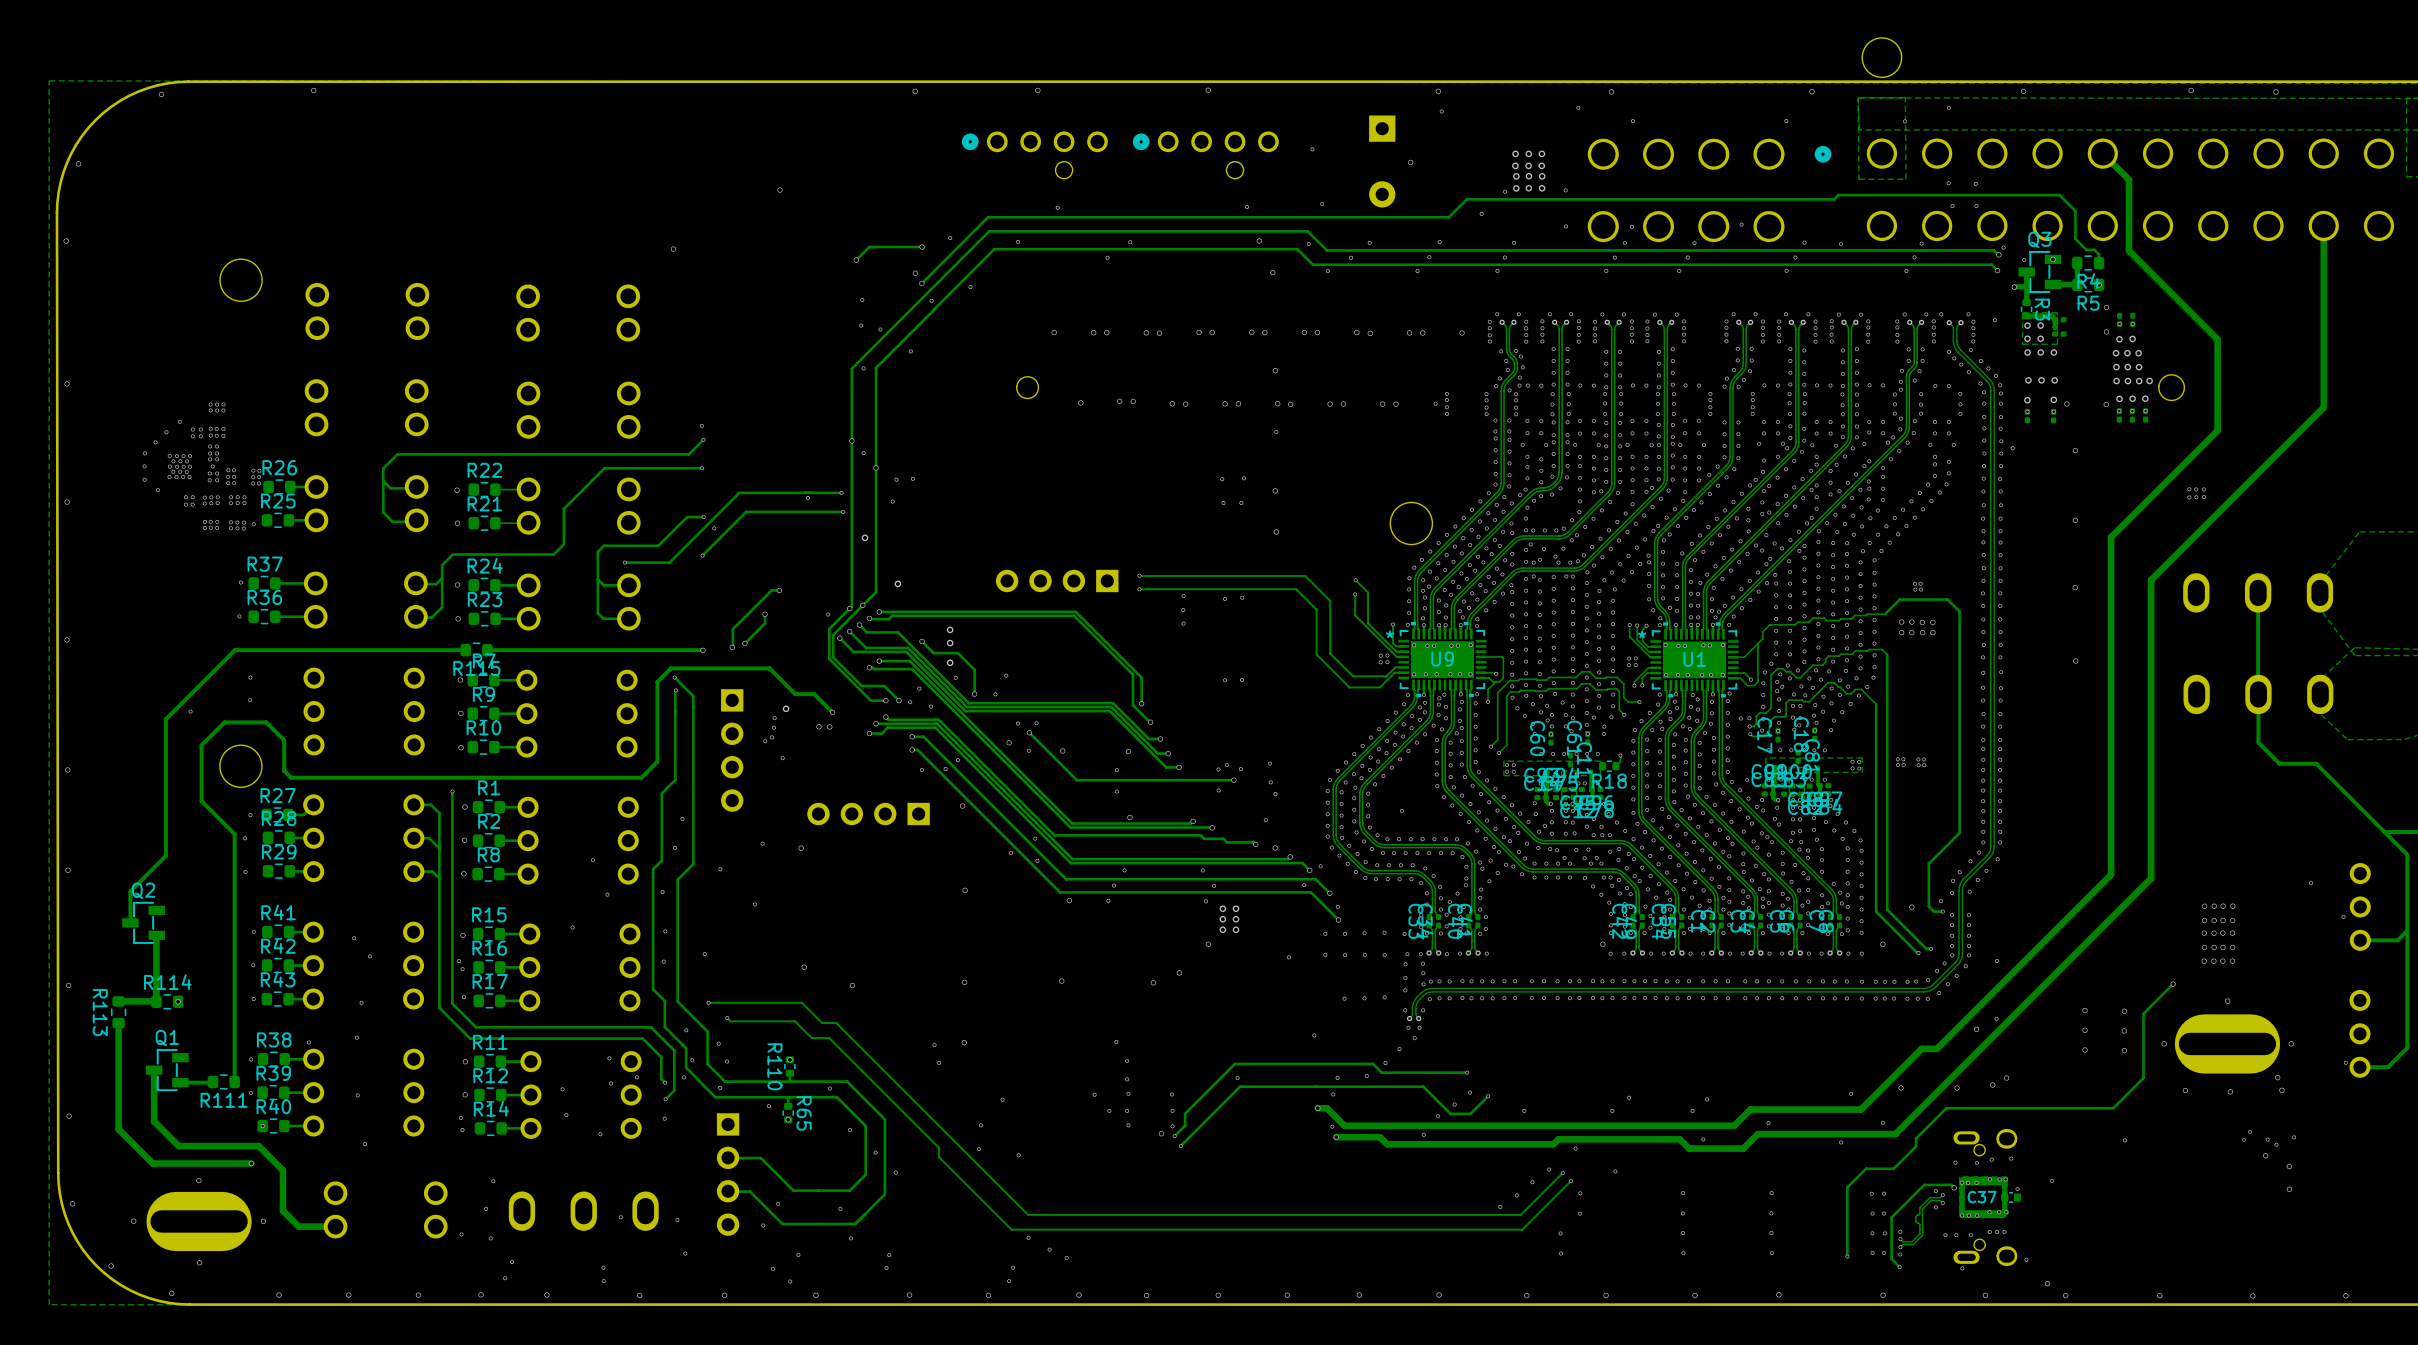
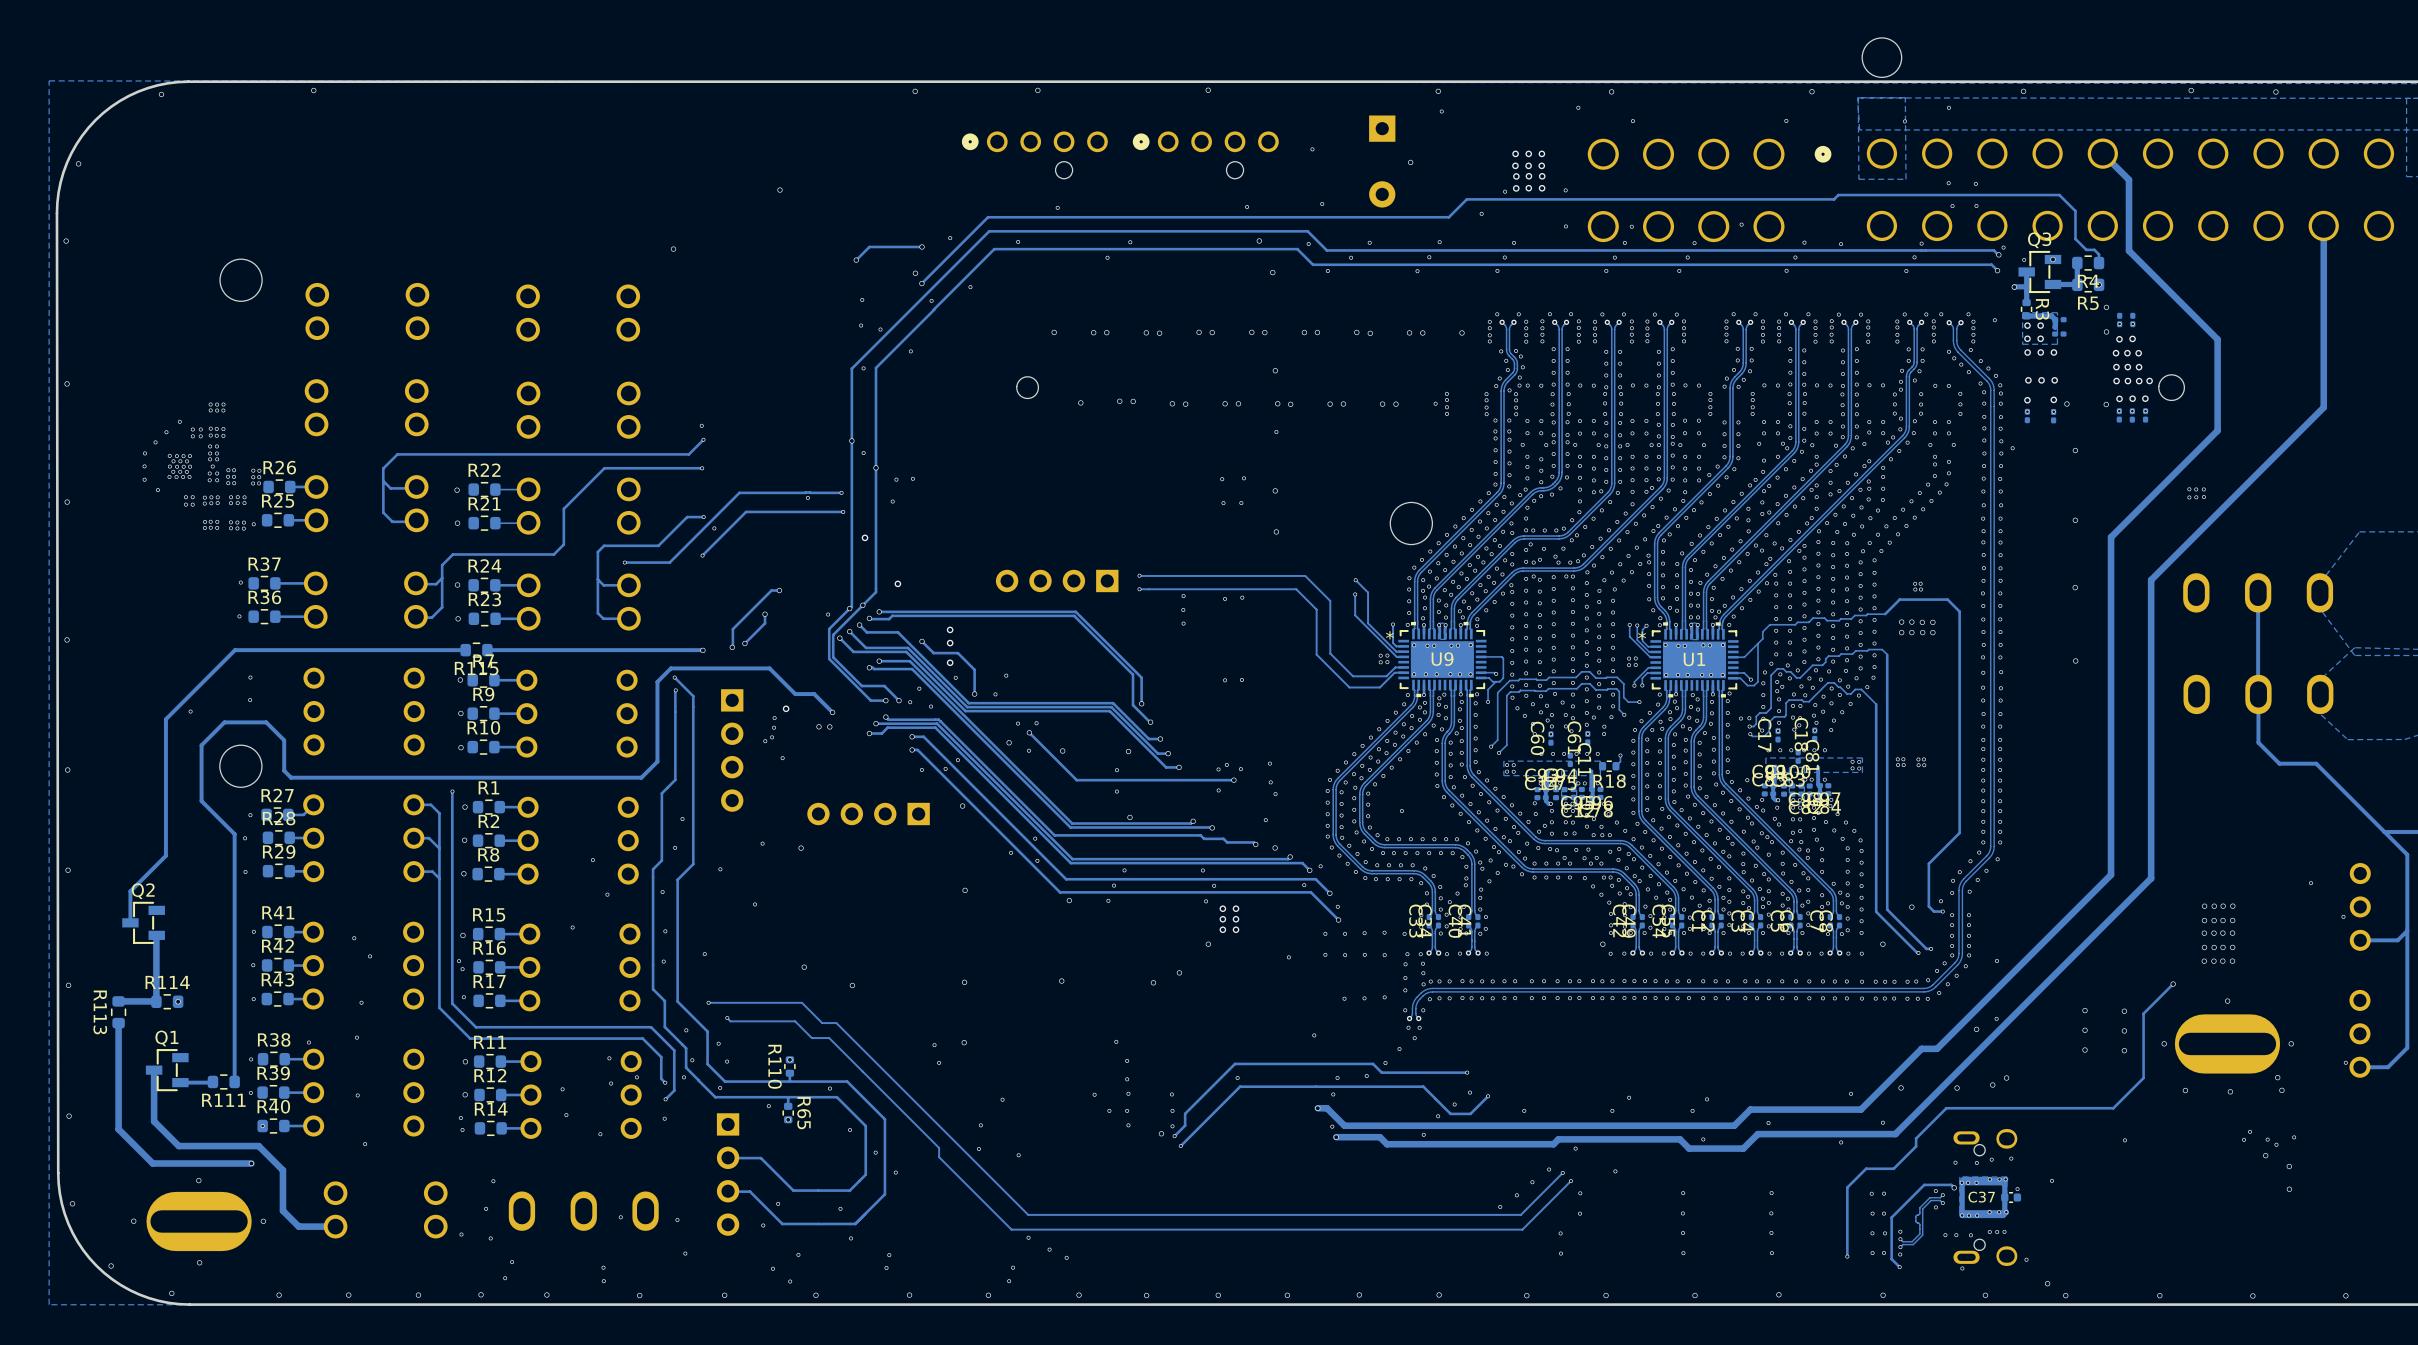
zone outline: none -> (1446, 623) (1438, 623) (1438, 639) (1446, 639) (1446, 623)
zone outline: none -> (1698, 623) (1690, 623) (1690, 639) (1698, 639) (1698, 623)

